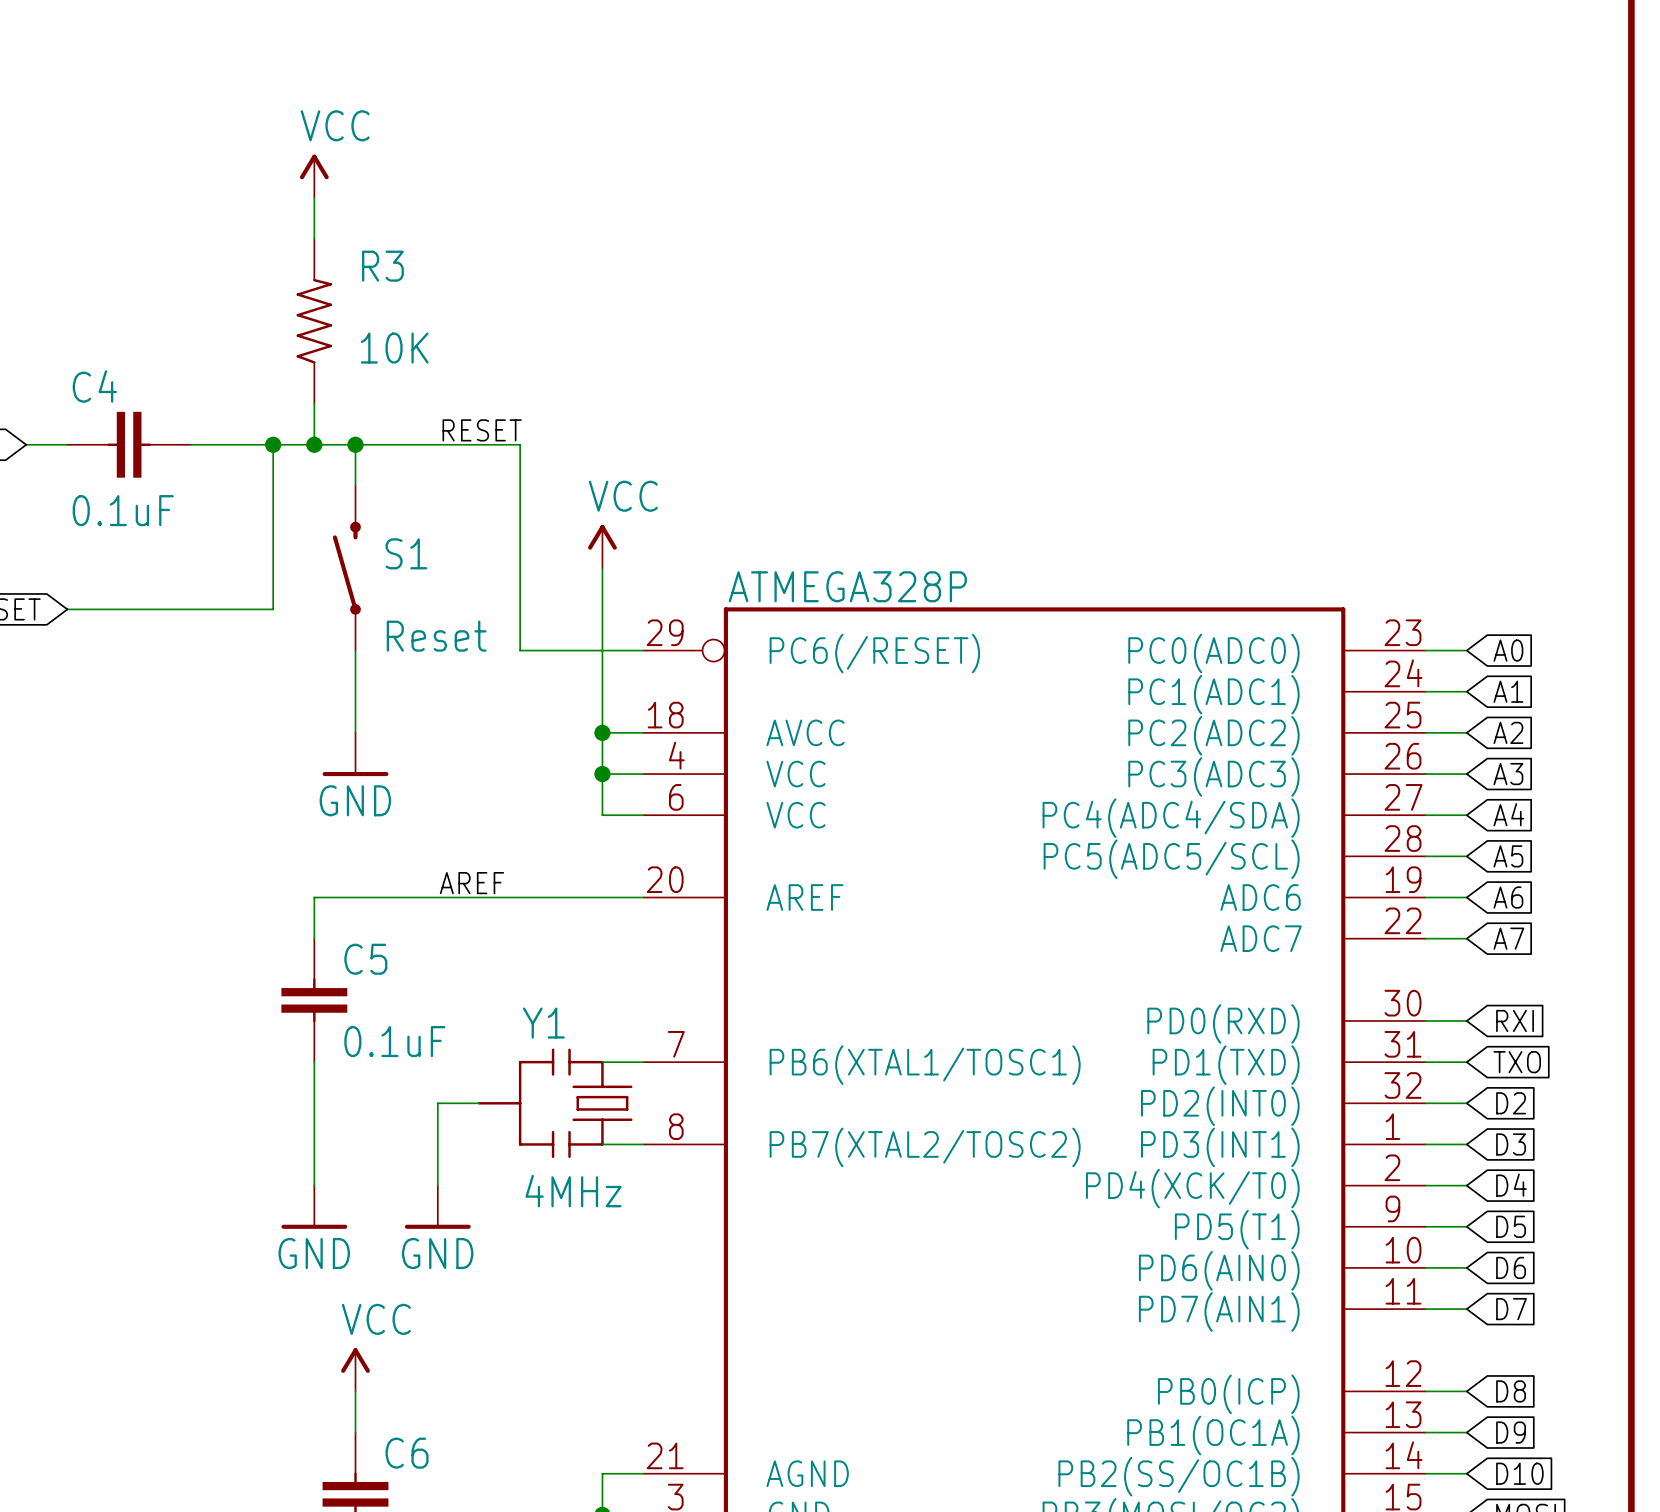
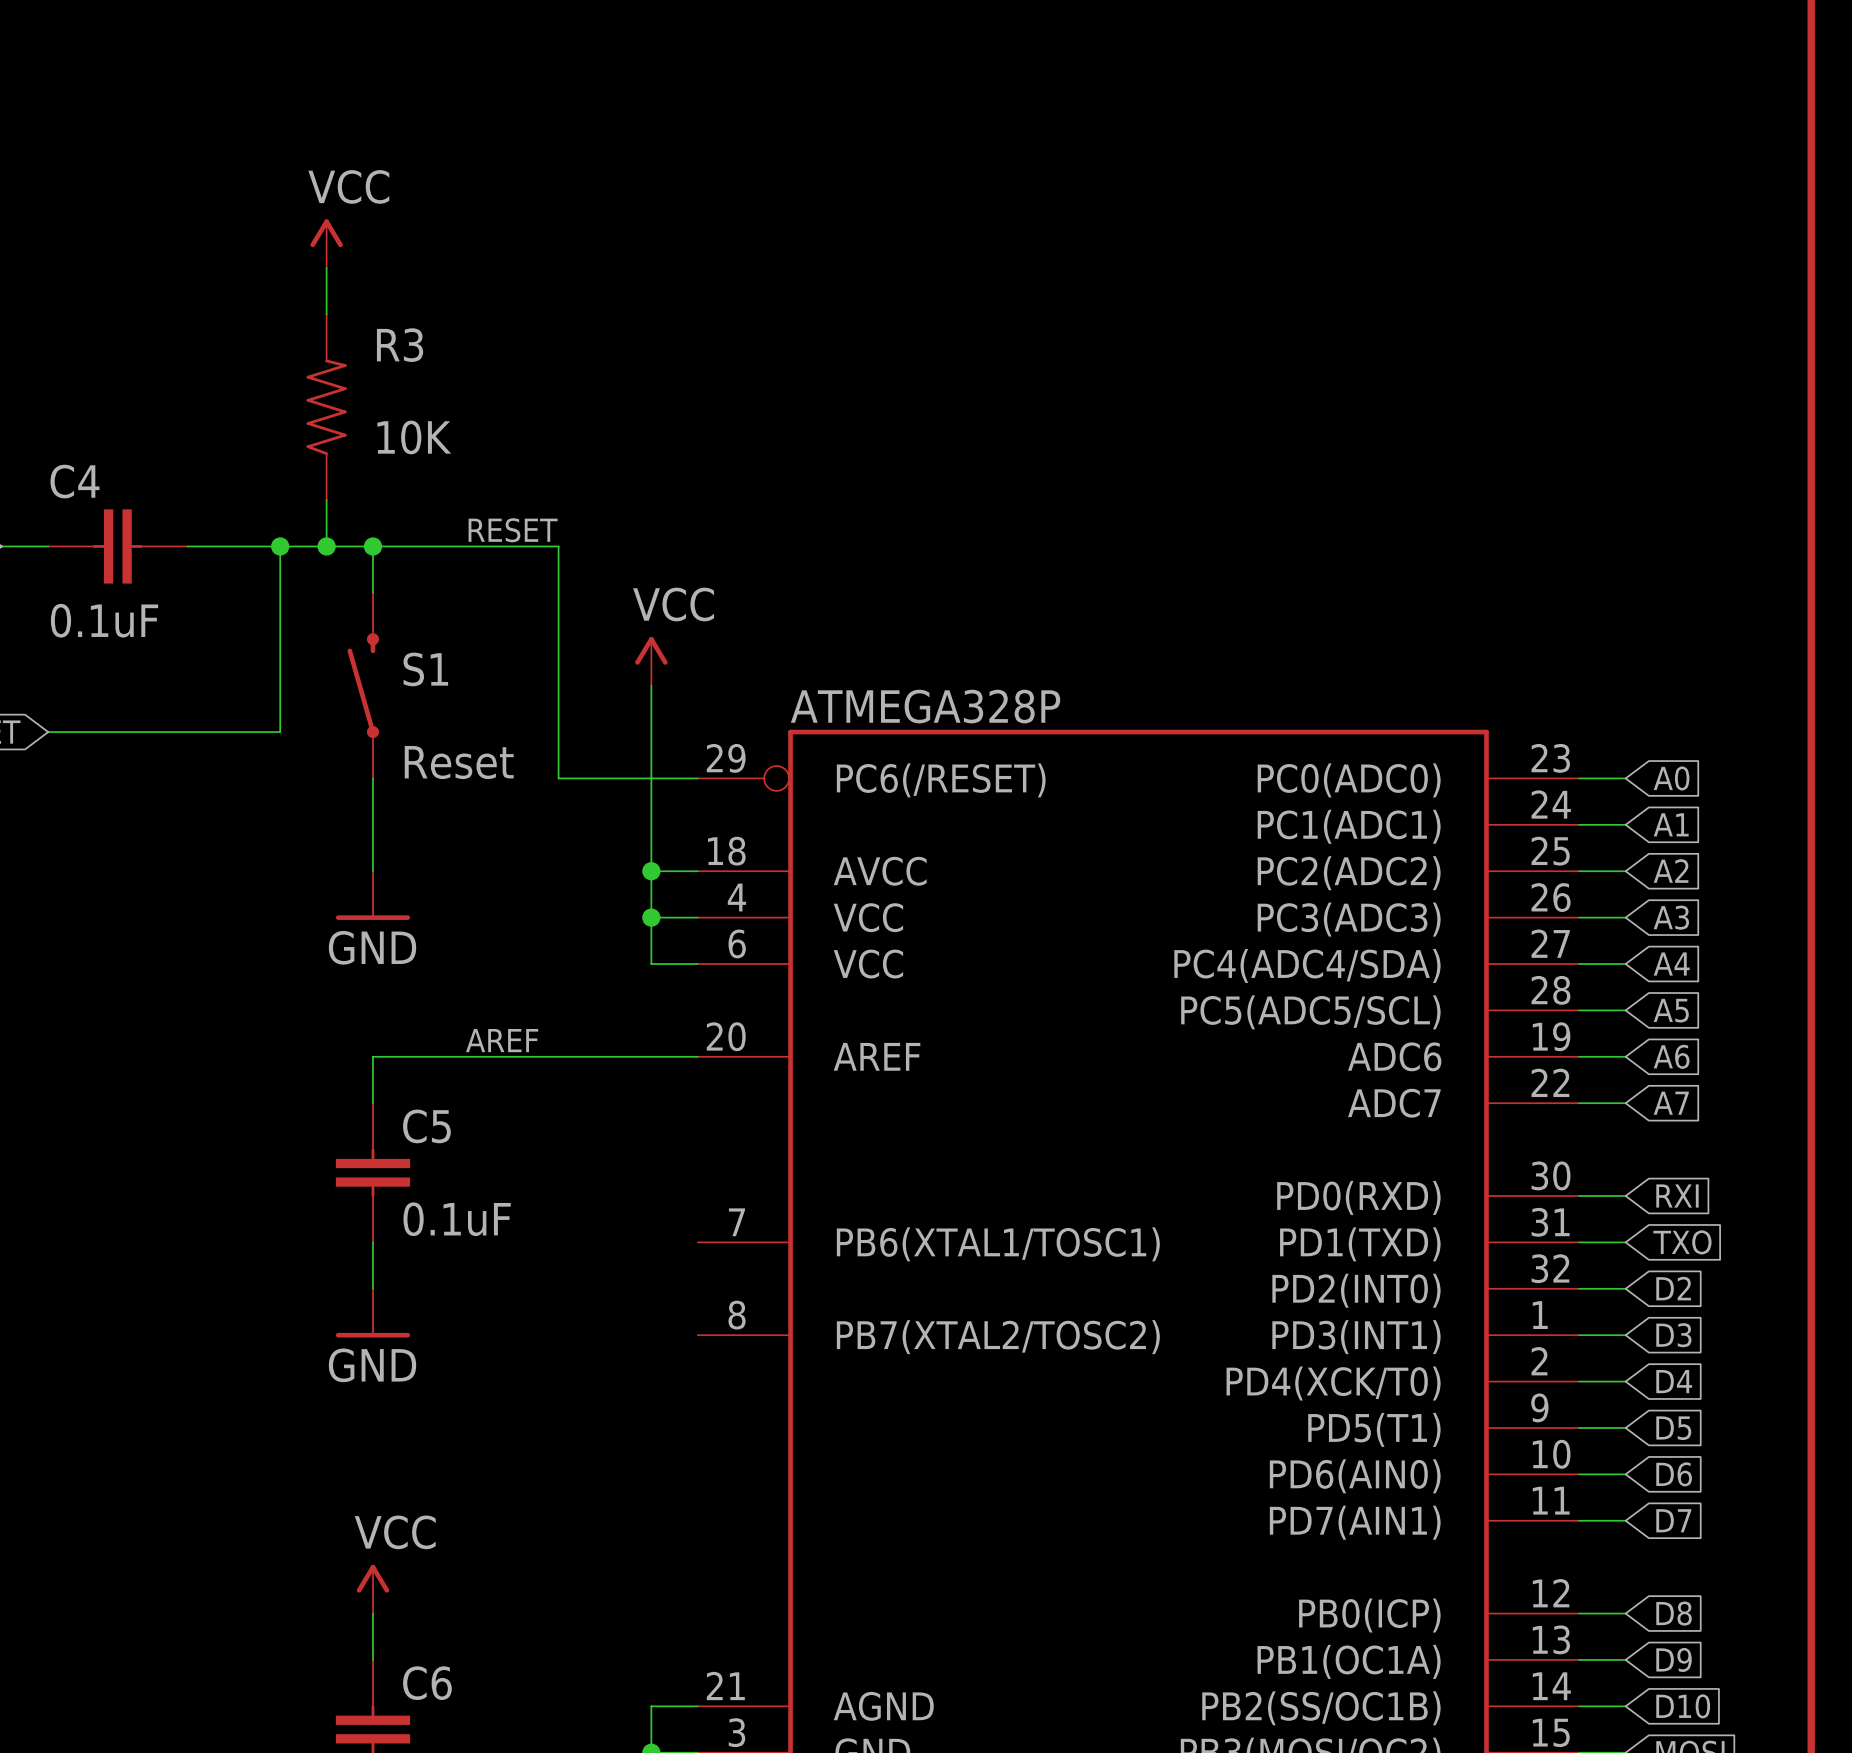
wire: (355, 897) (314, 897) (314, 938) -> (373, 1056) (373, 1103)
C5 position: (314, 1000) -> (373, 1172)
wire: (314, 1062) (314, 1185) -> none
wire: none -> (373, 1242) (373, 1288)
wire: (602, 1062) (643, 1062) -> none
wire: (478, 1103) (437, 1103) (437, 1185) -> none
Y1: 4MHz (555, 1103) -> none
power symbol: none -> GND (373, 1313)
wire: (602, 1144) (643, 1144) -> none
power symbol: GND (314, 1207) -> none
power symbol: GND (437, 1207) -> none

